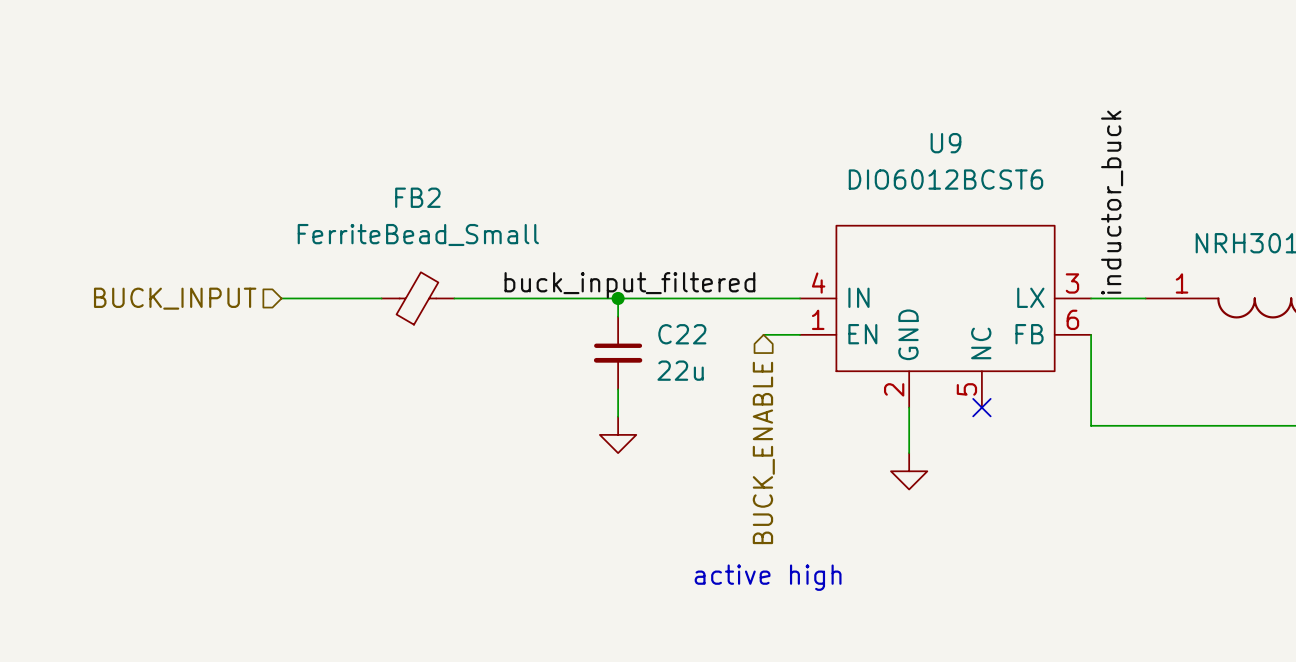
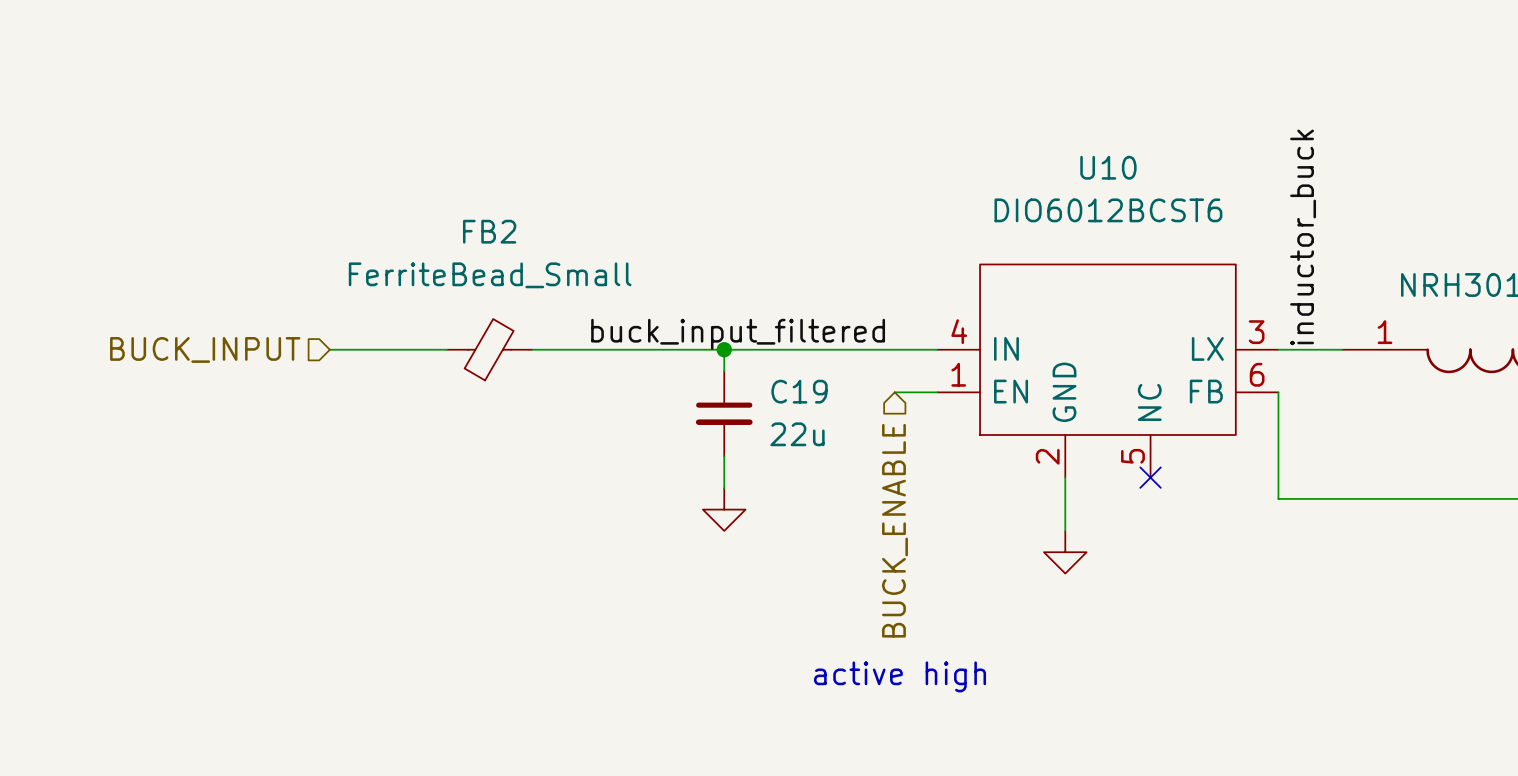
U9 name: U9 (945, 143) -> U10 (1108, 167)
C22 name: C22 (682, 334) -> C19 (799, 391)

